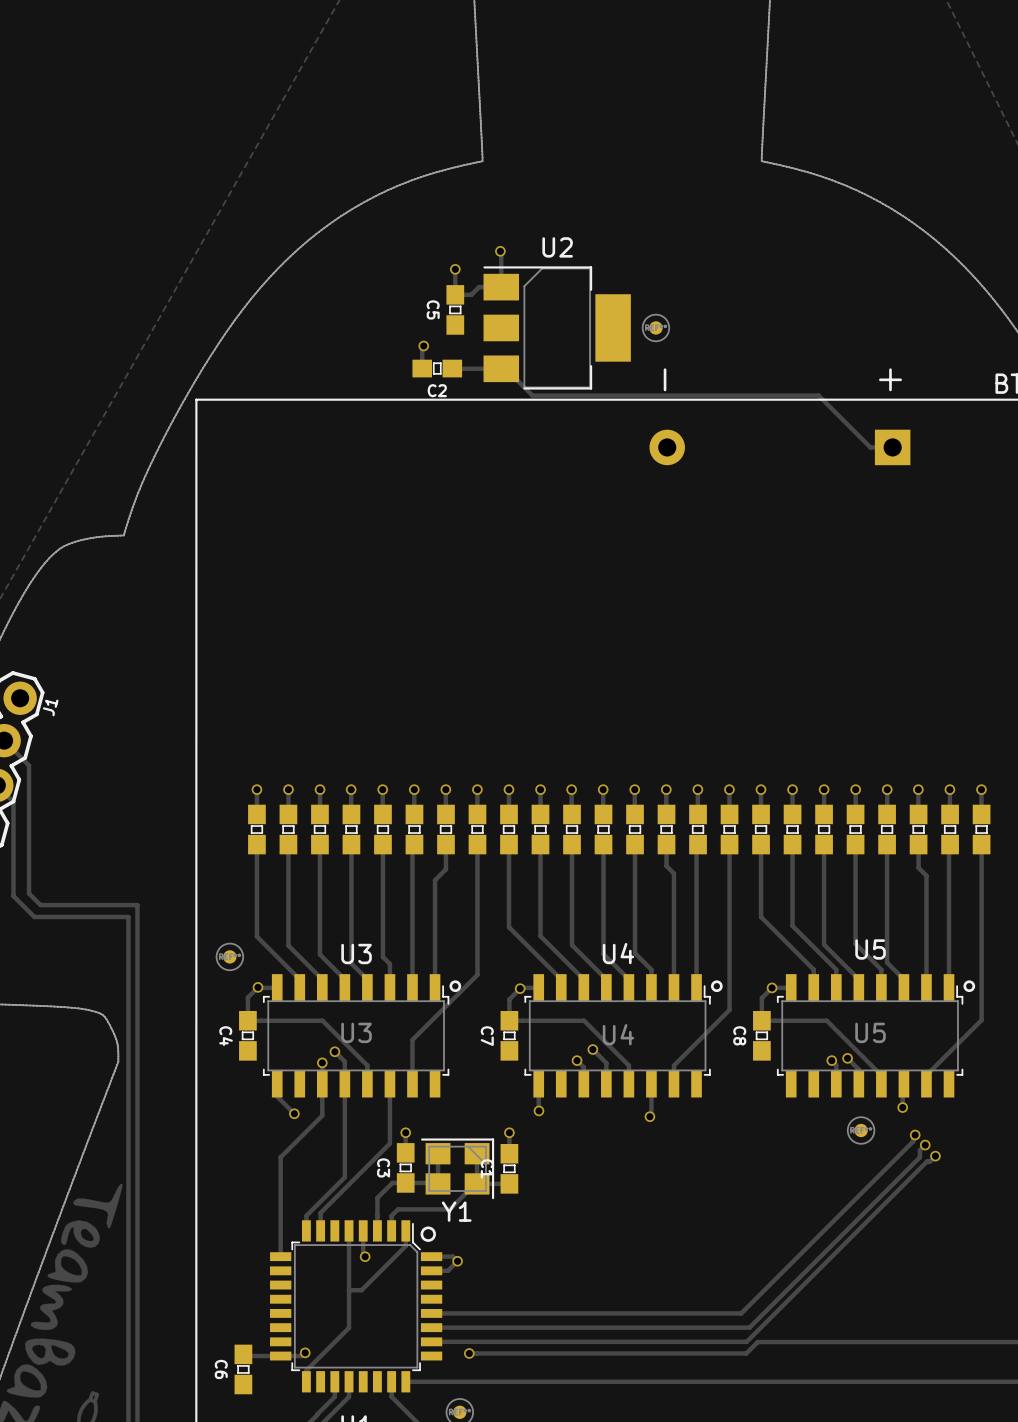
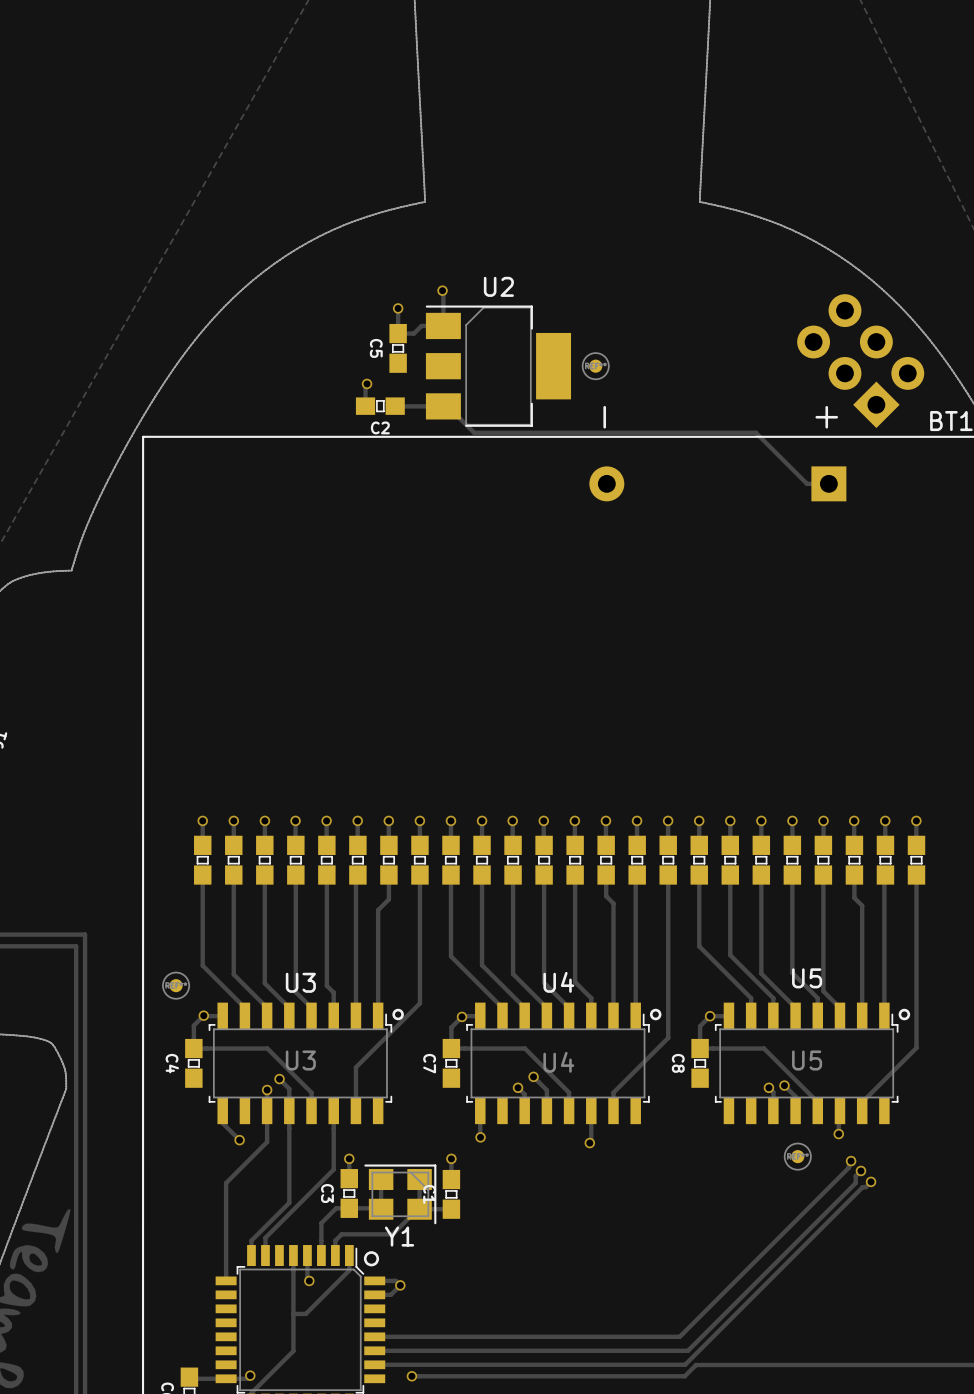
part: none -> (860, 361)

